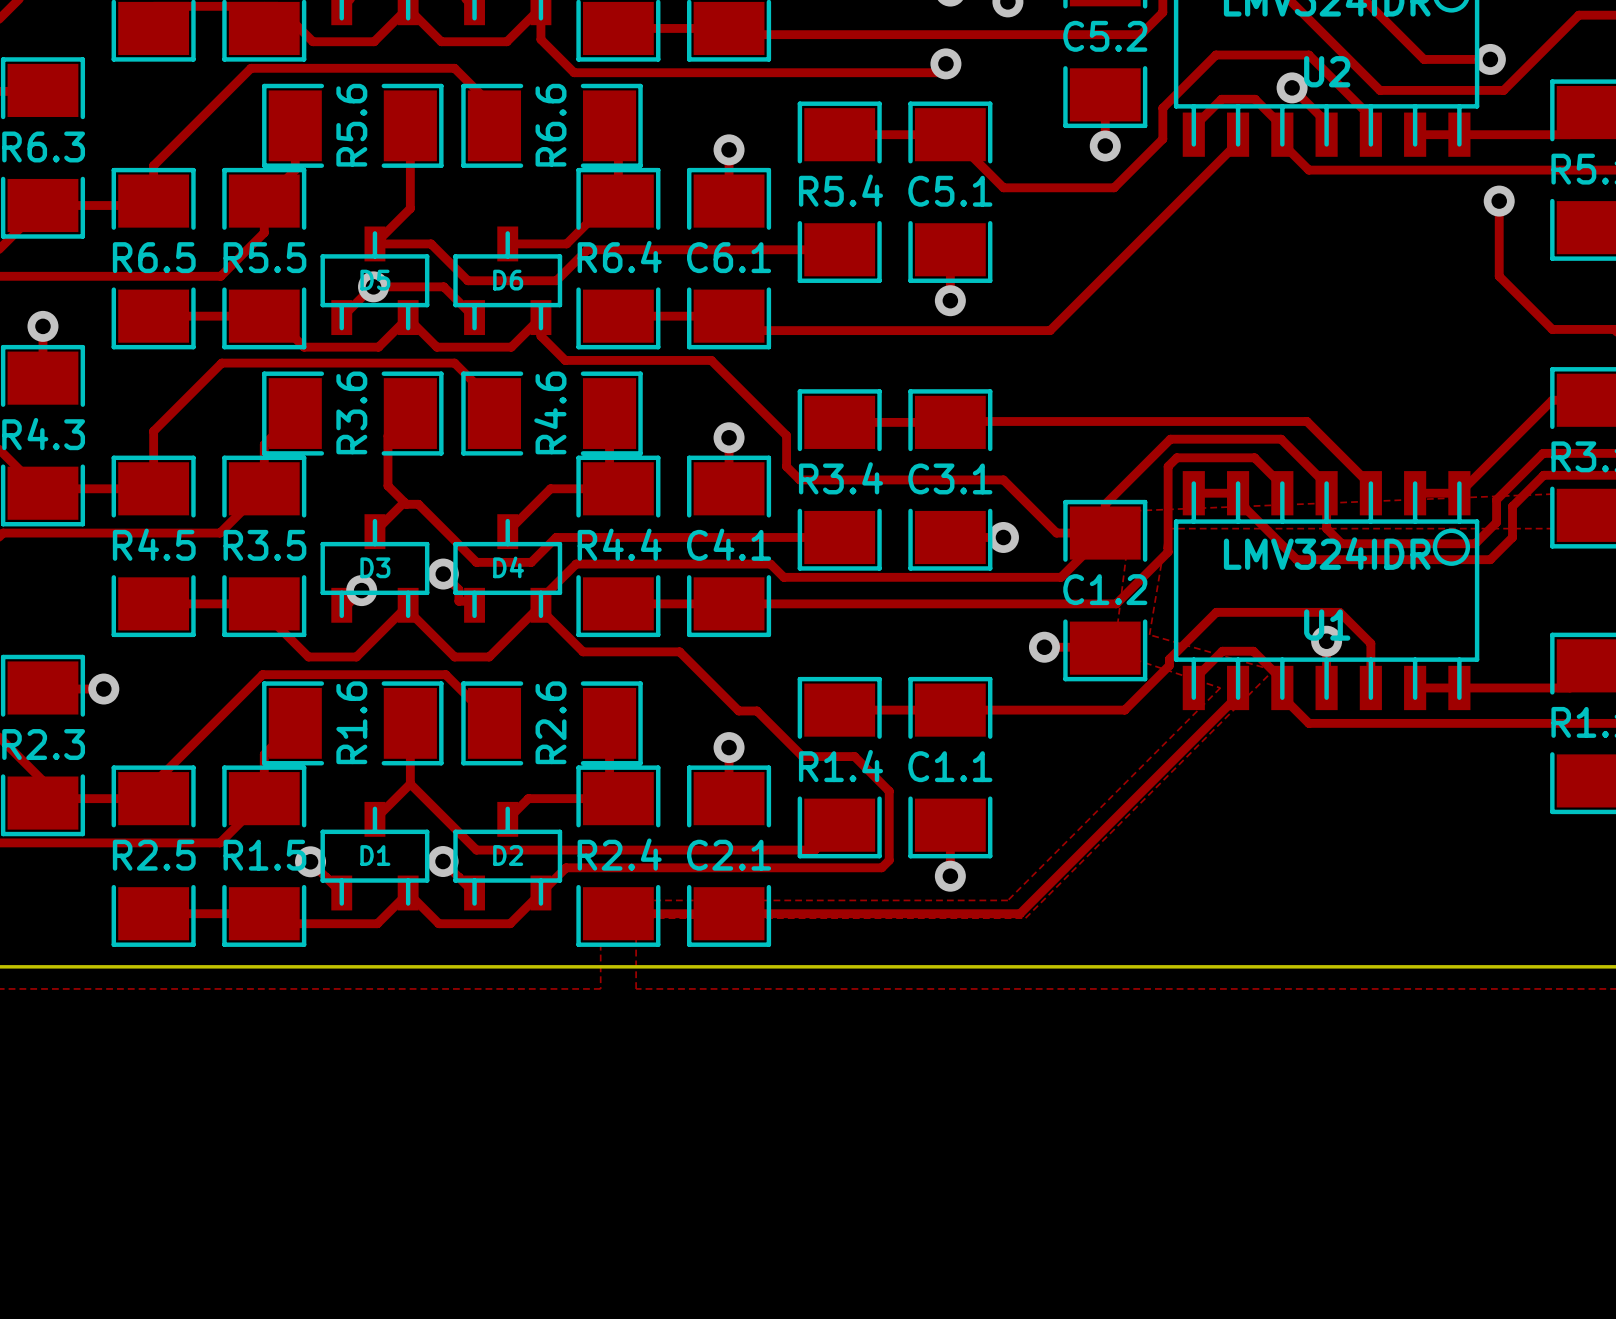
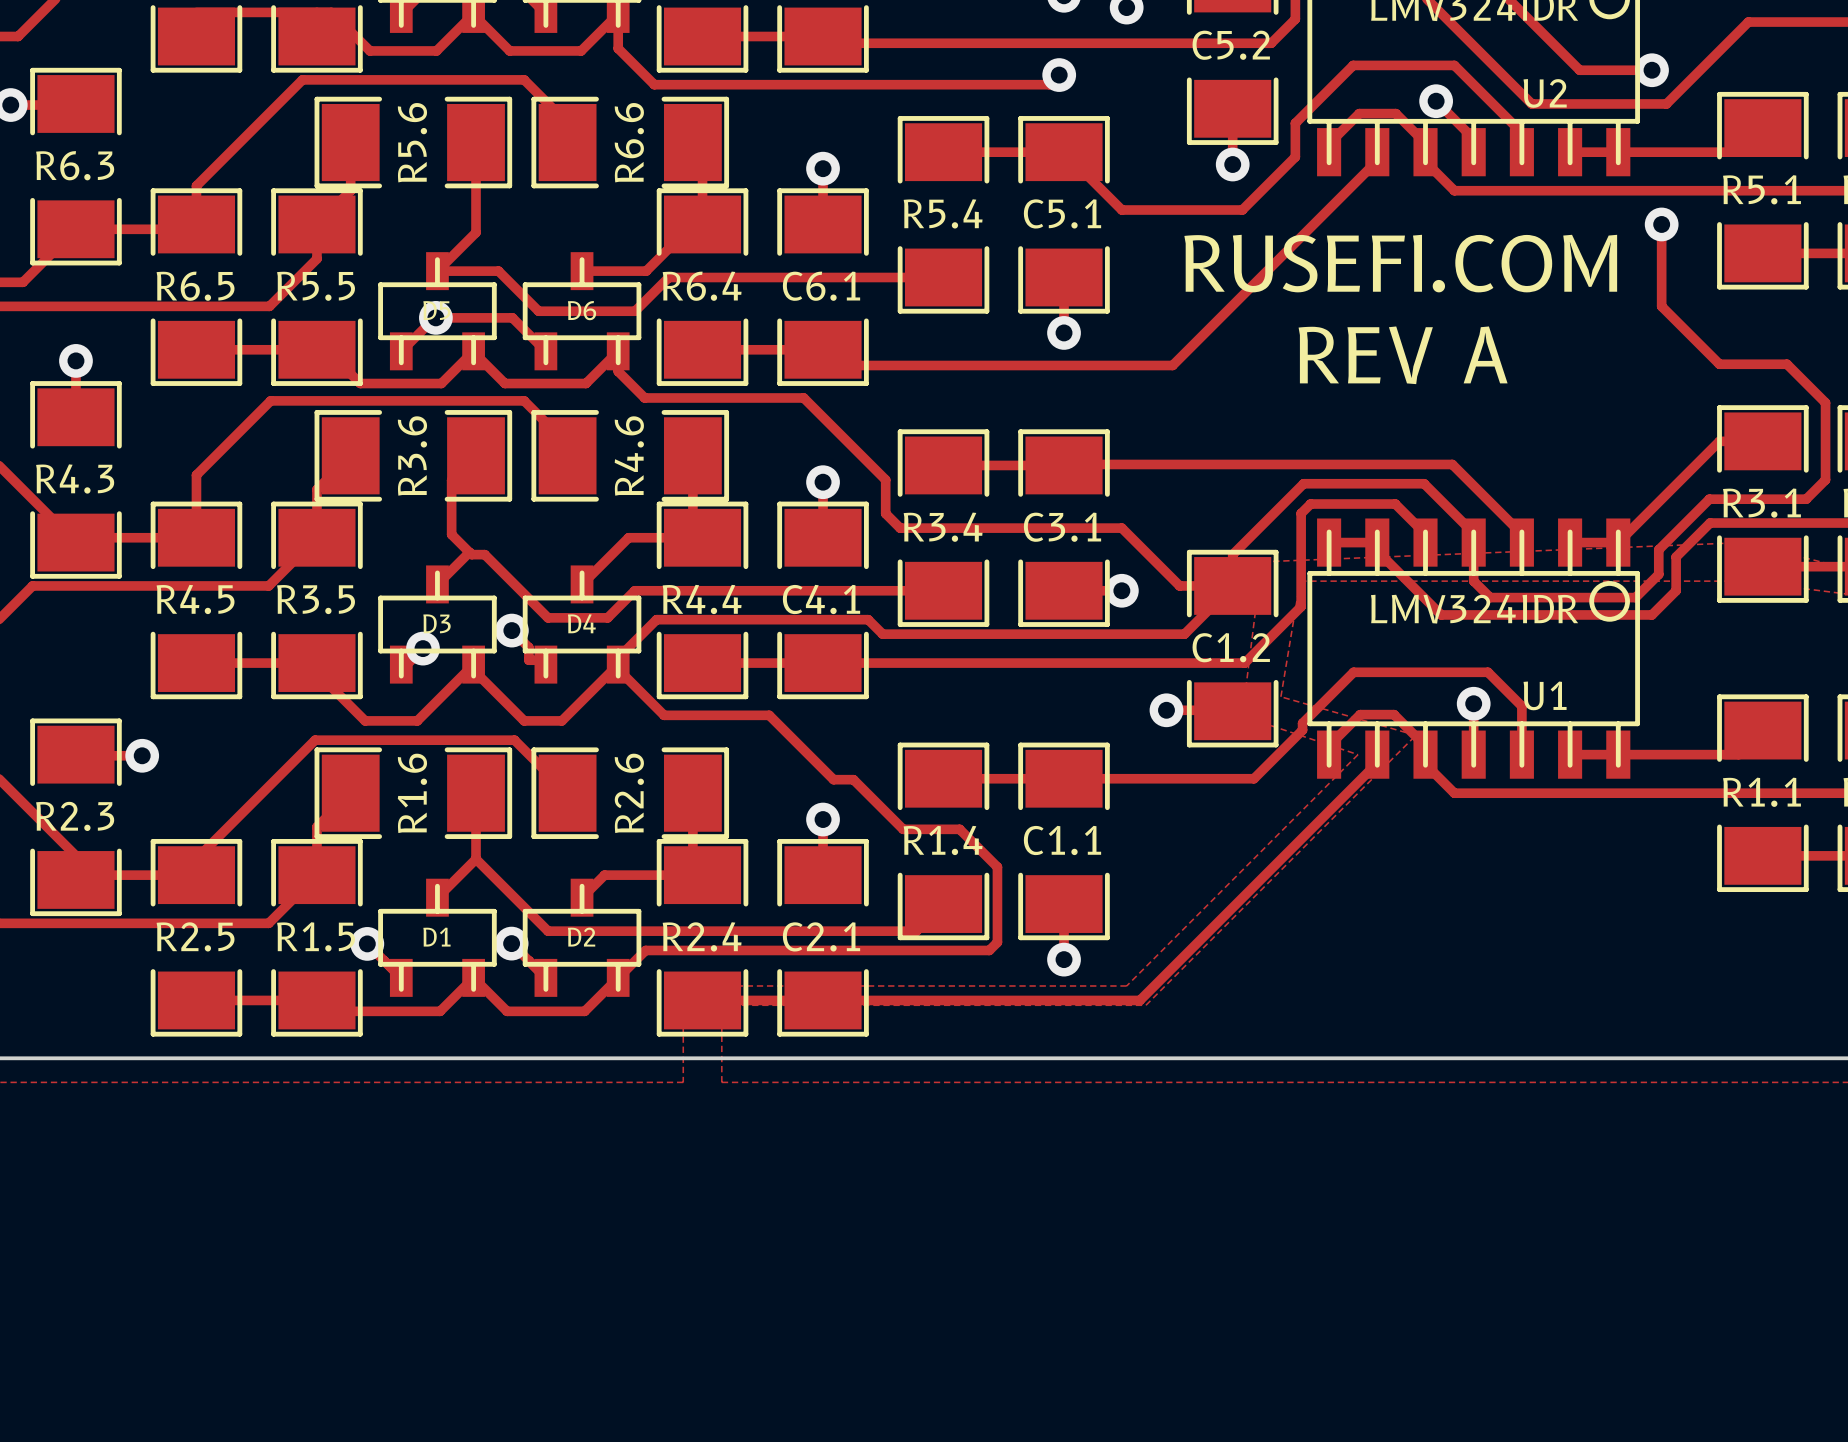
U2 name position: U2 (1327, 71) -> U2 (1545, 93)
text: none -> RUSEFI.COM (1400, 263)
text: none -> REV A (1403, 355)
U1 name position: U1 (1327, 625) -> U1 (1545, 695)

